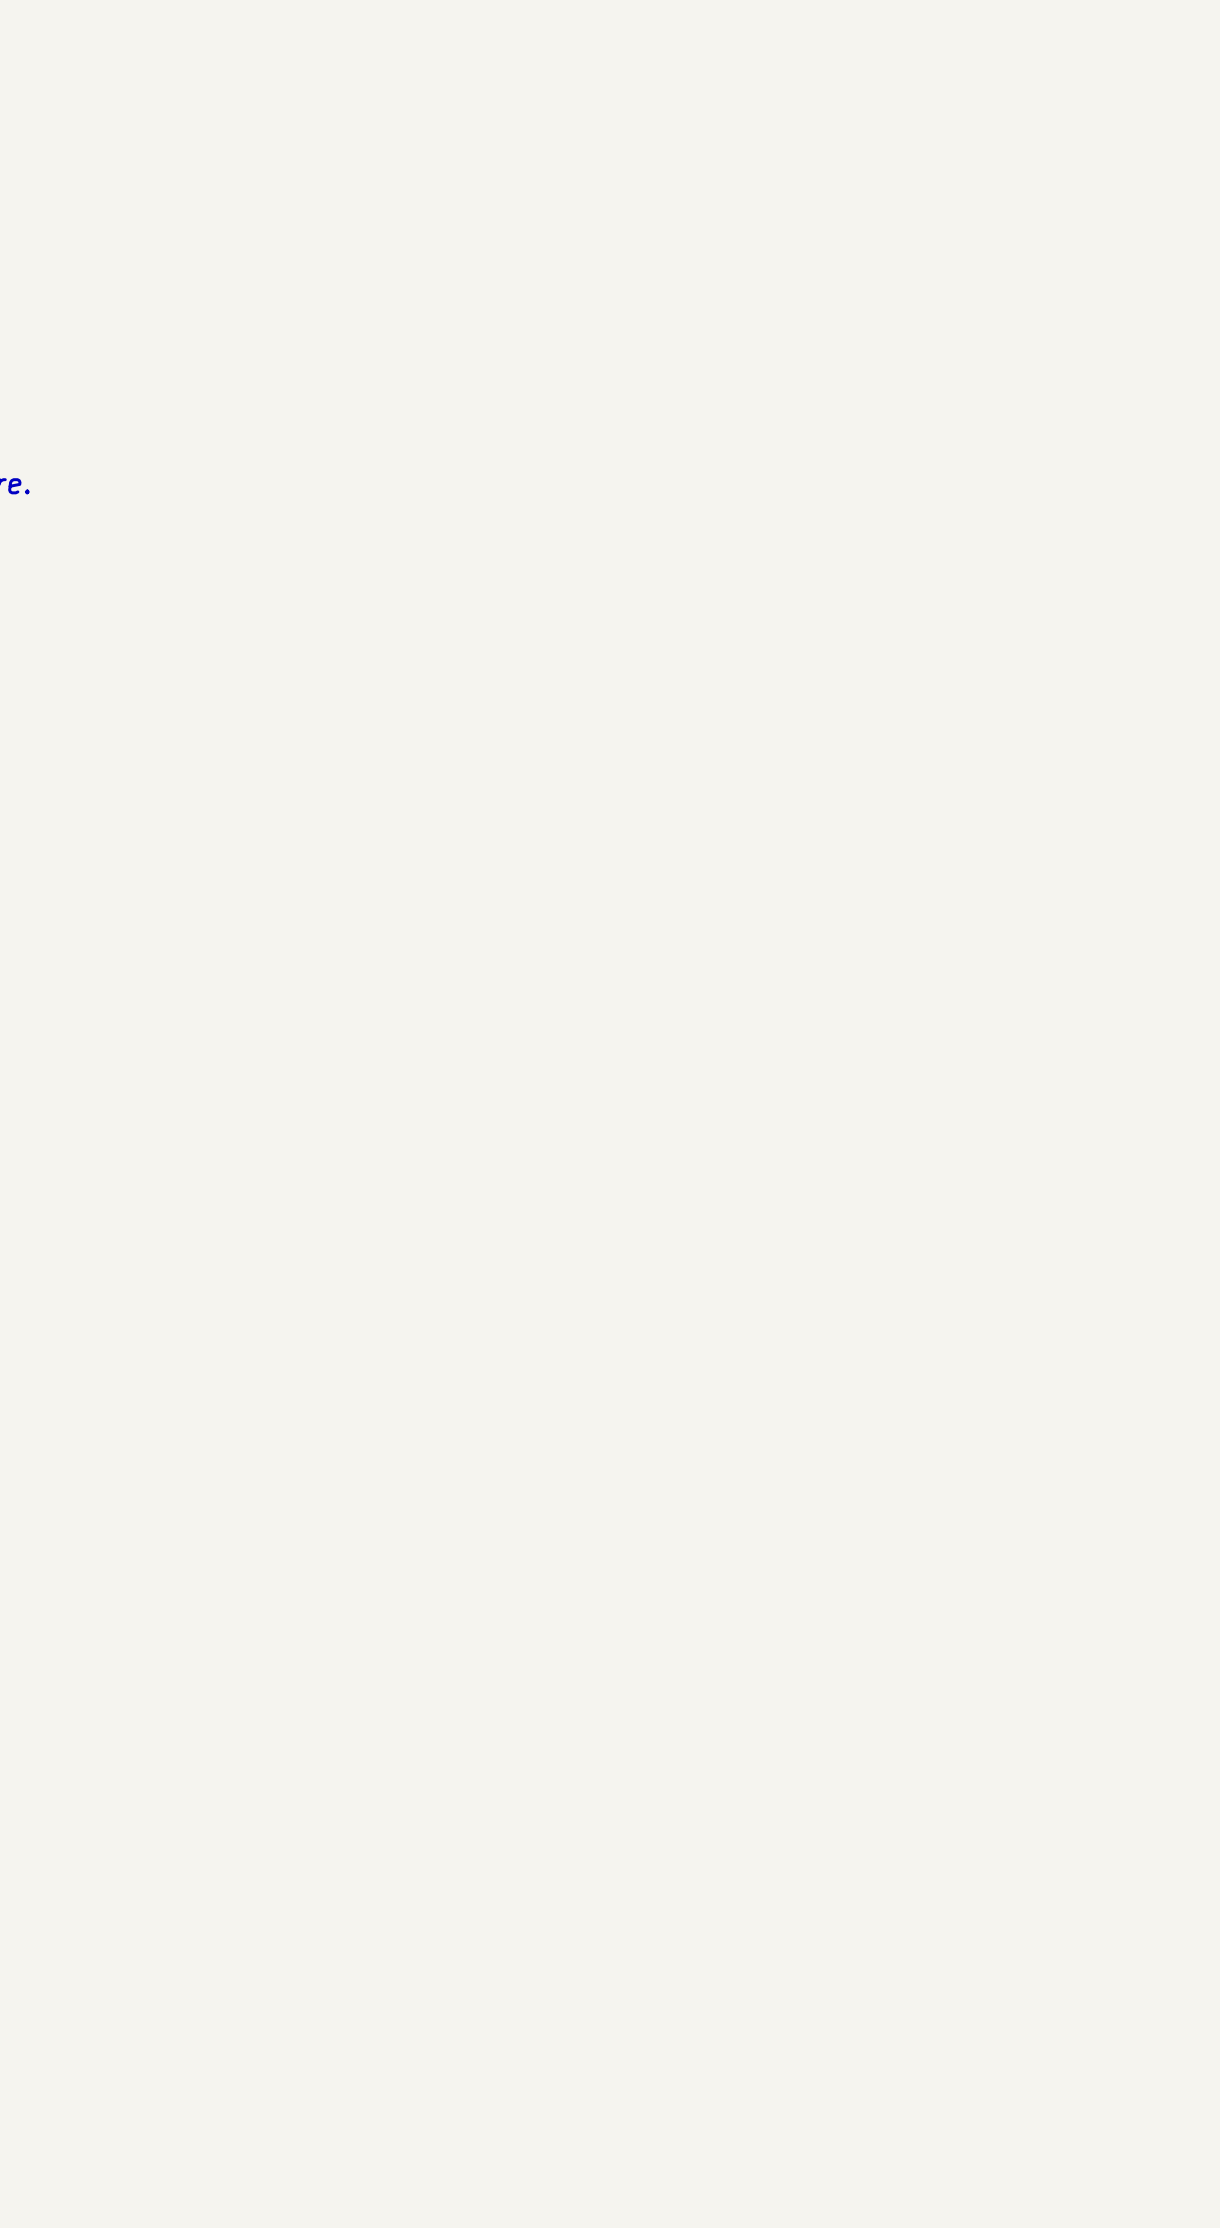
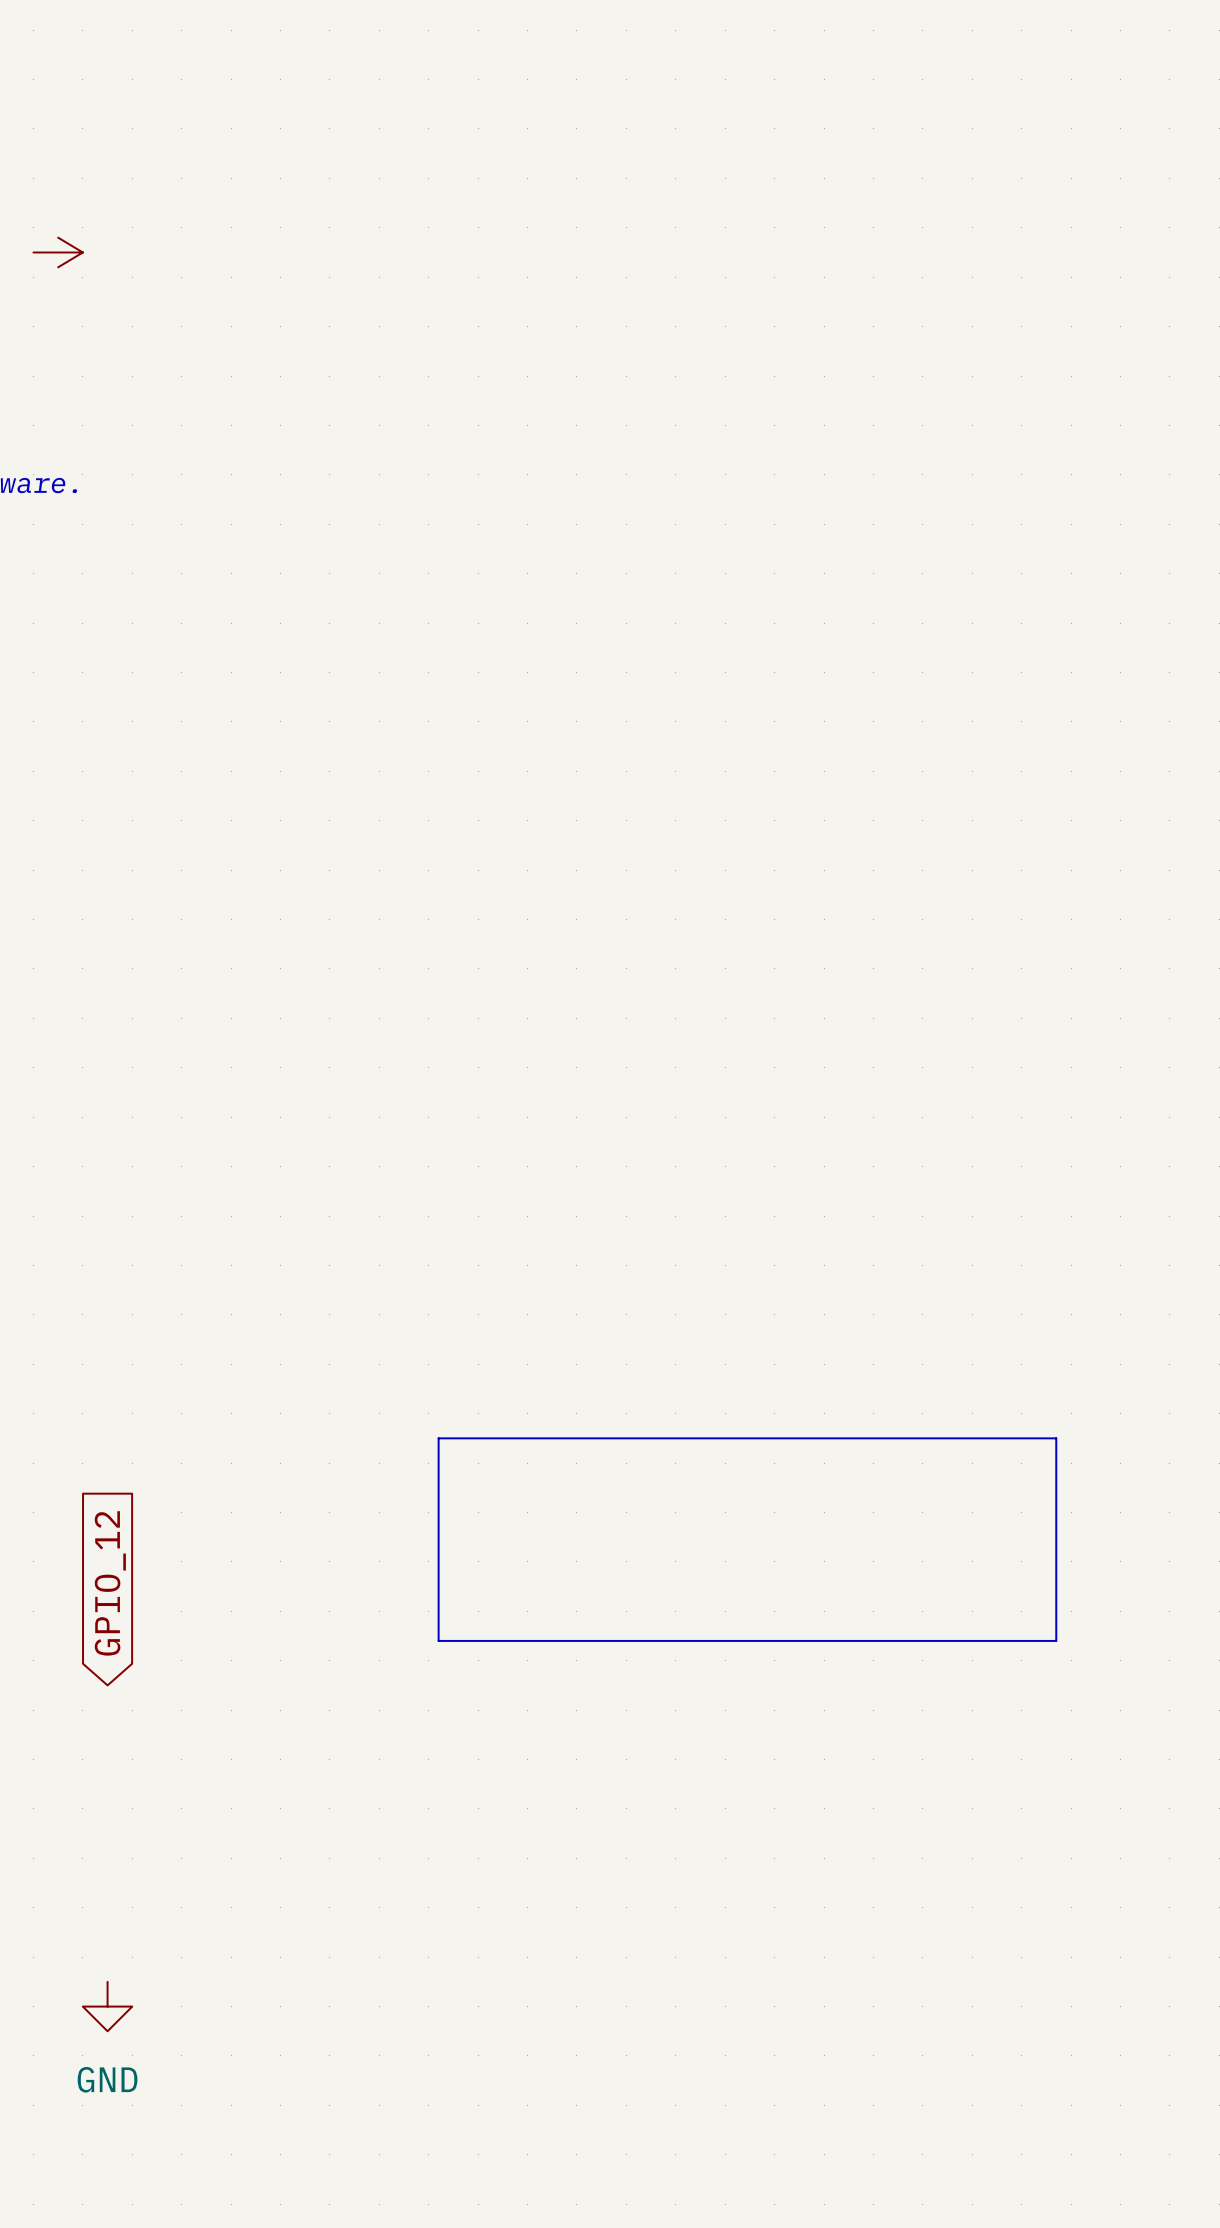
power symbol: none -> (58, 252)
line: none -> (438, 1438) (1056, 1438) (1056, 1640) (438, 1640) (438, 1438)
global label: none -> GPIO_12 (110, 1583)
power symbol: none -> GND (107, 2006)

